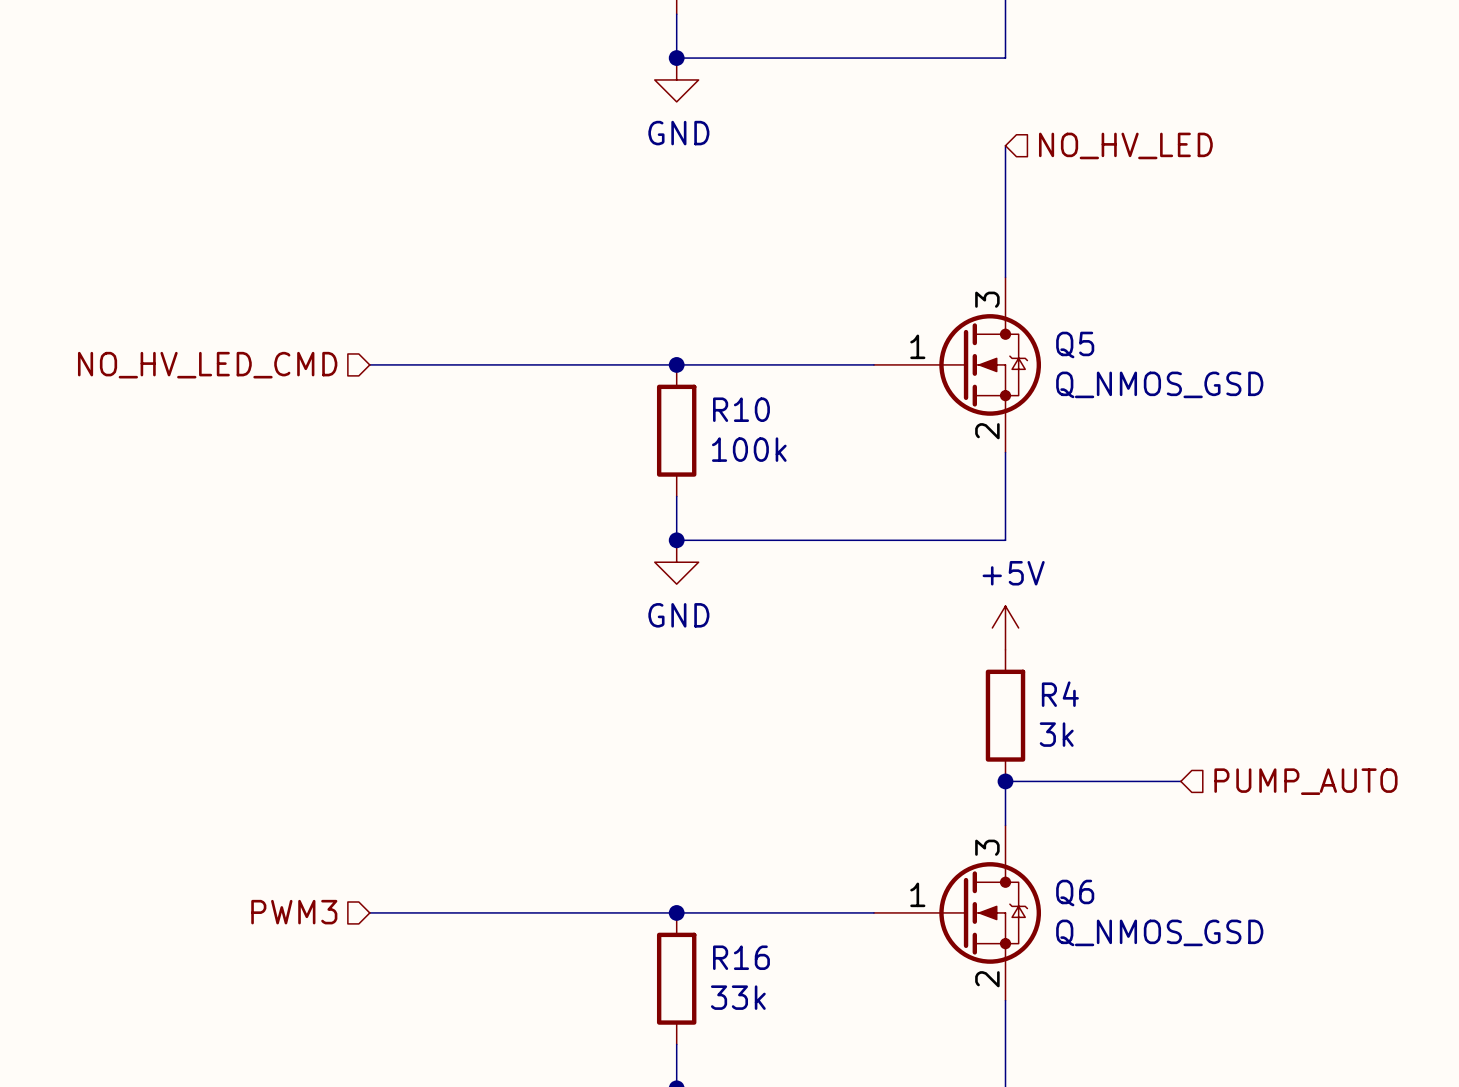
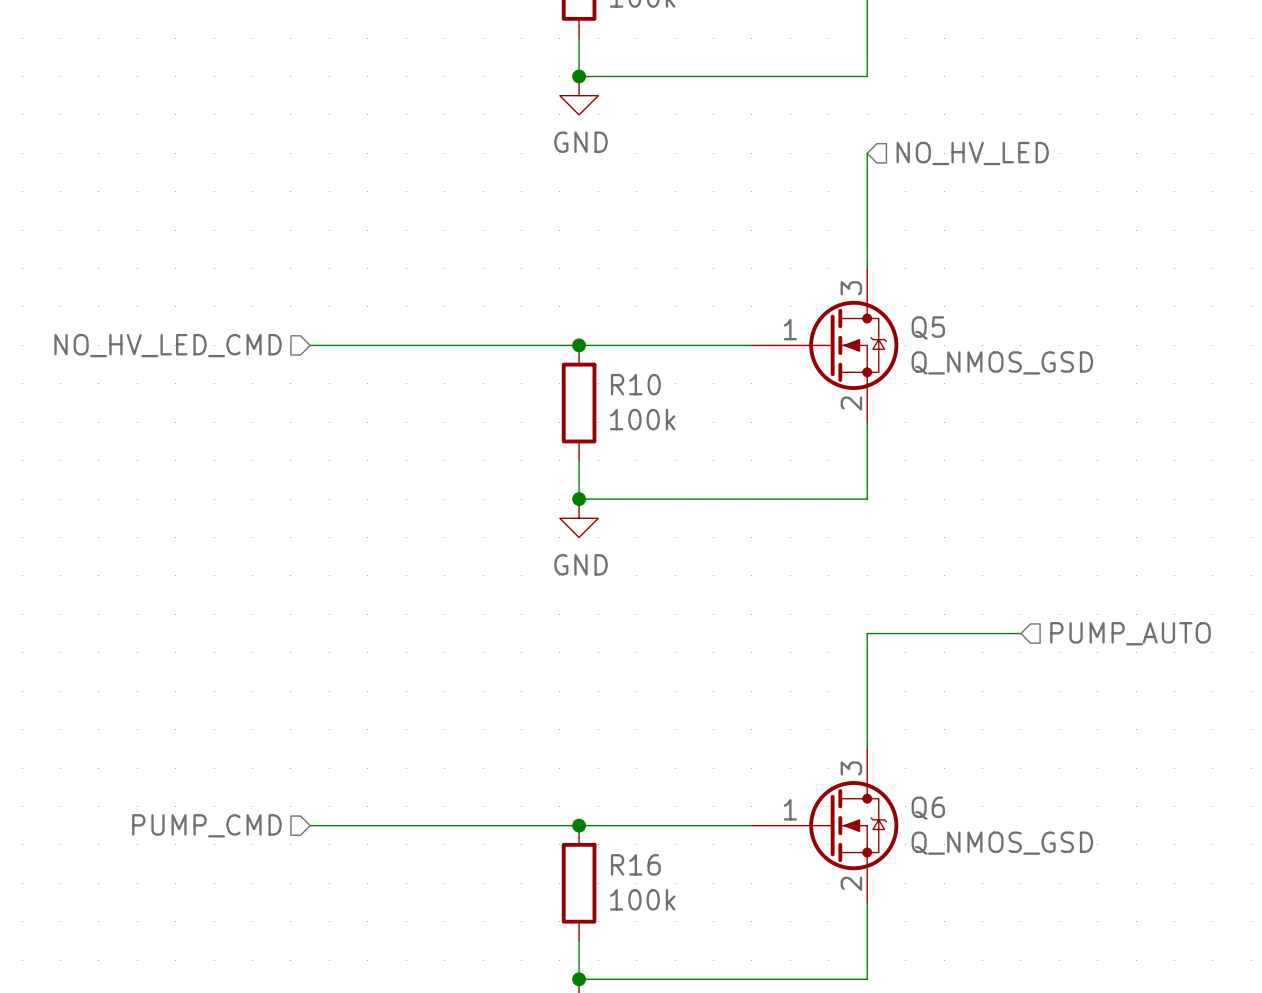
power symbol: +5V (1005, 627) -> none
R4: 3k (1005, 715) -> none
wire: (1005, 781) (1180, 781) -> (867, 710) (867, 633) (1020, 633)
junction: (1005, 781) -> none
hierarchical label position: PUMP_AUTO (1305, 781) -> PUMP_AUTO (1130, 633)
hierarchical label: PWM3 (294, 912) -> PUMP_CMD (206, 825)
R16 value: 33k (738, 997) -> 100k (642, 899)

